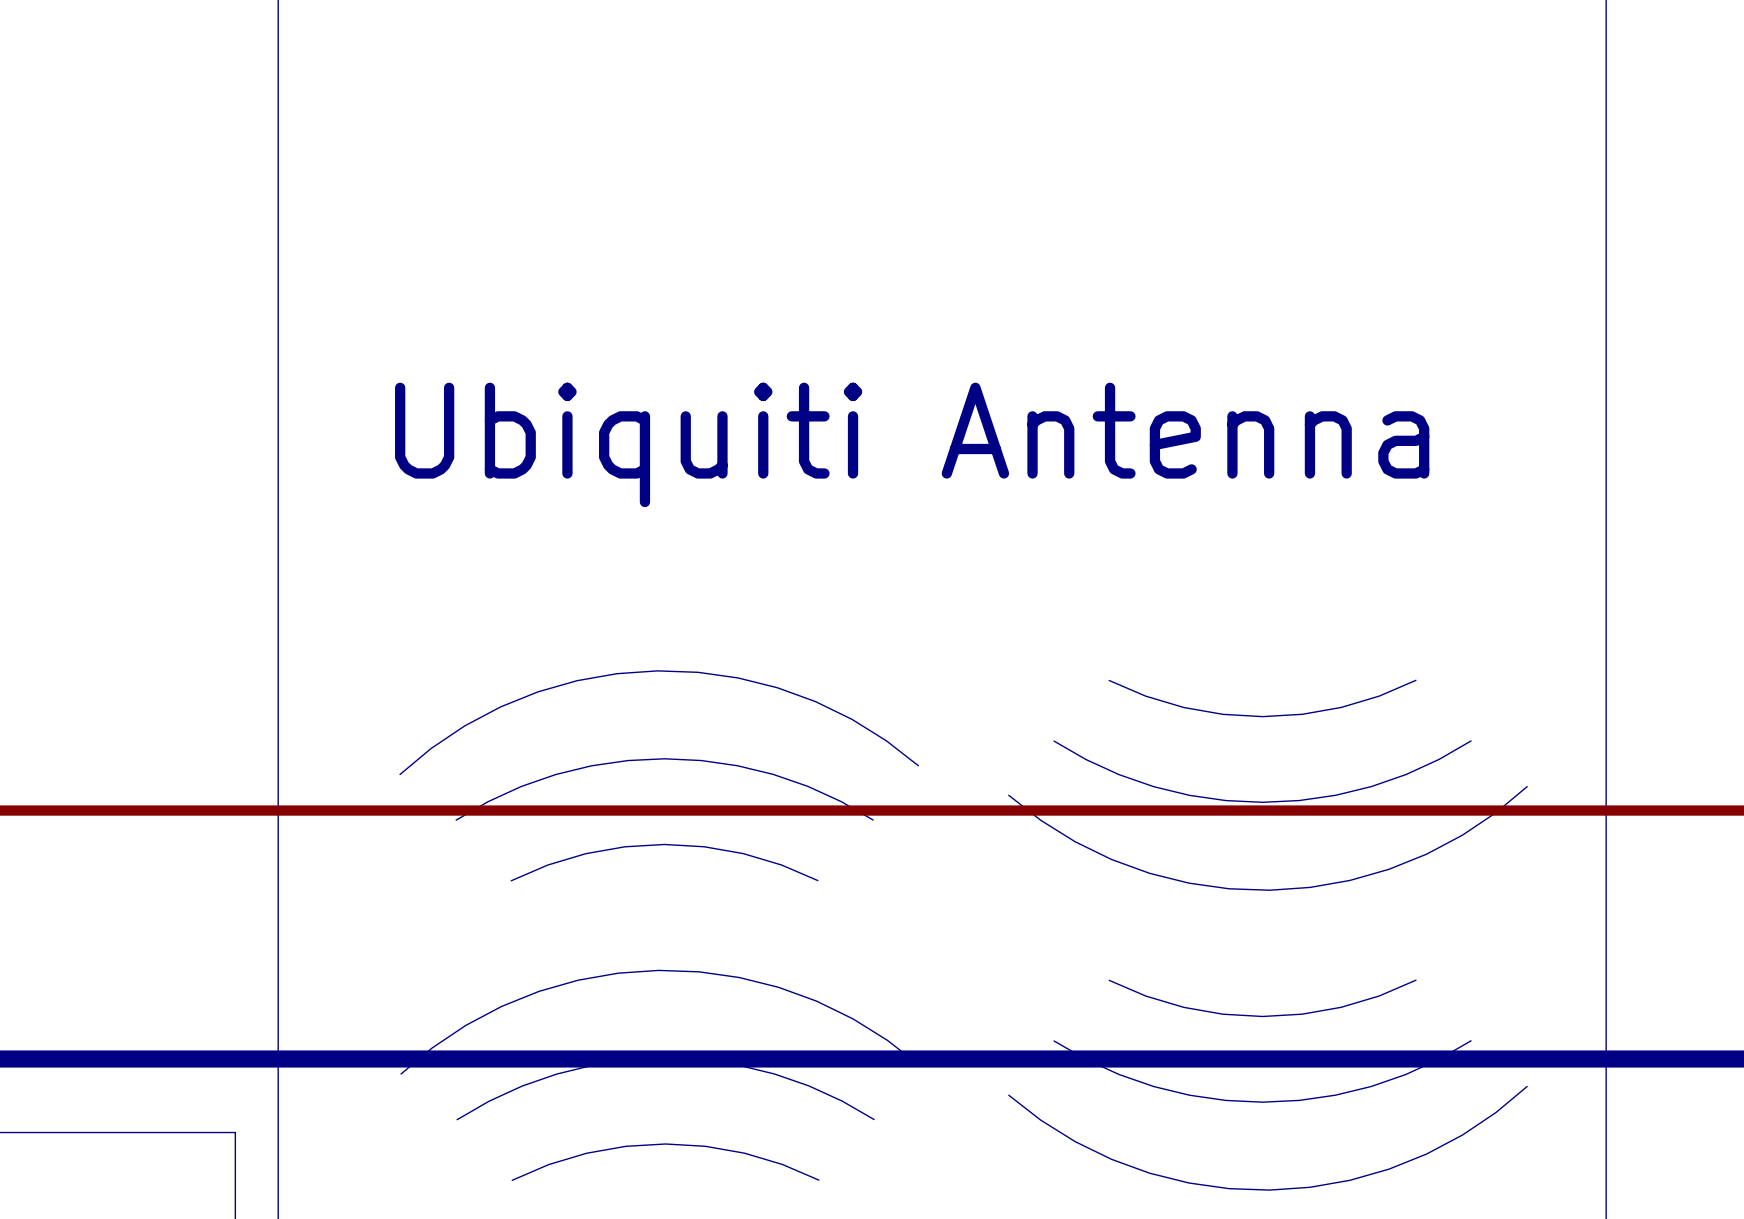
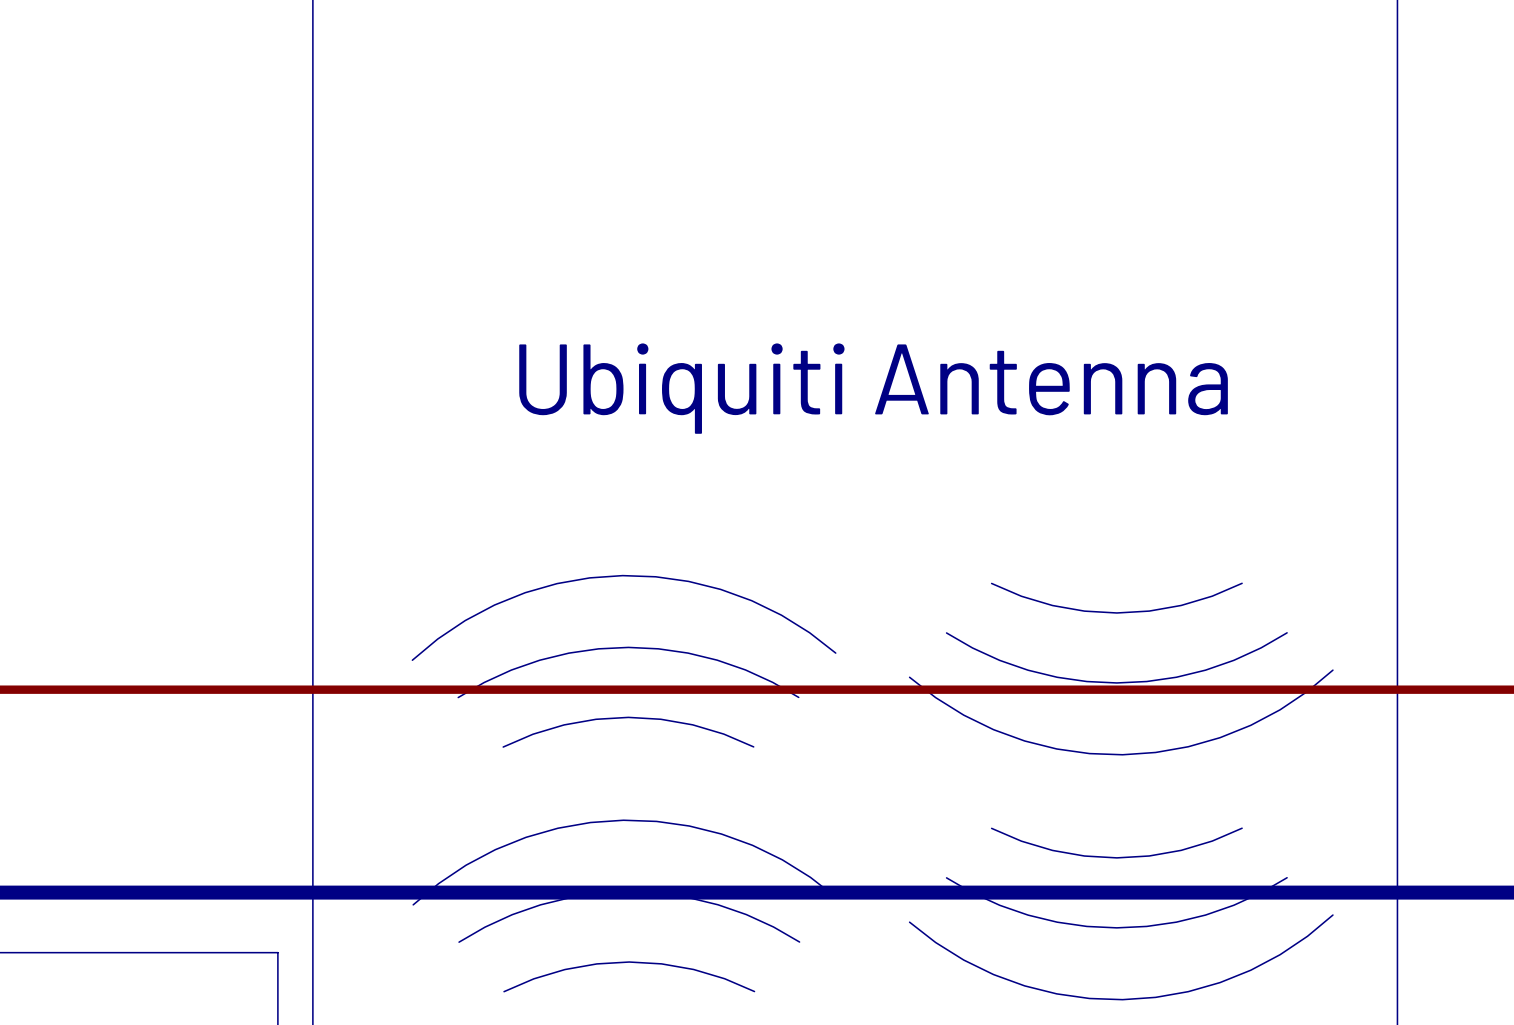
text position: Ubiquiti Antenna (912, 444) -> Ubiquiti Antenna (873, 388)

